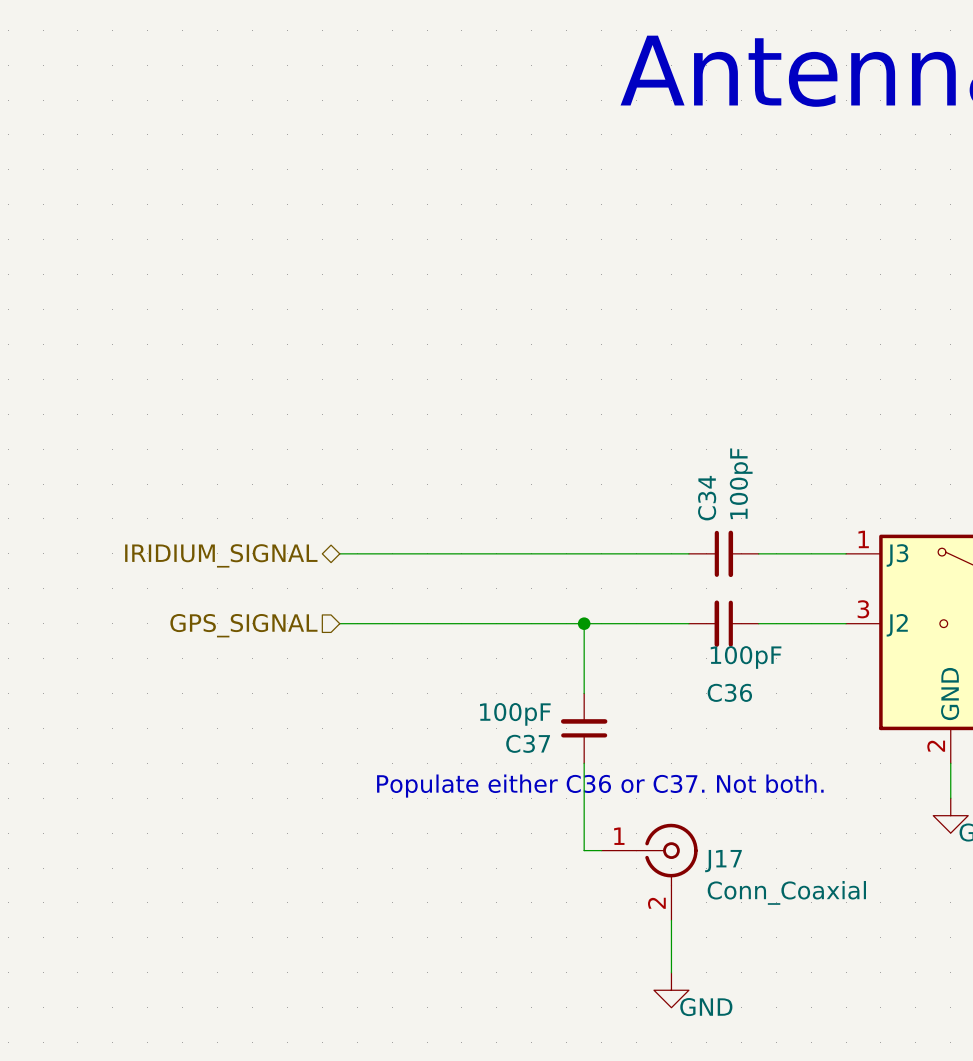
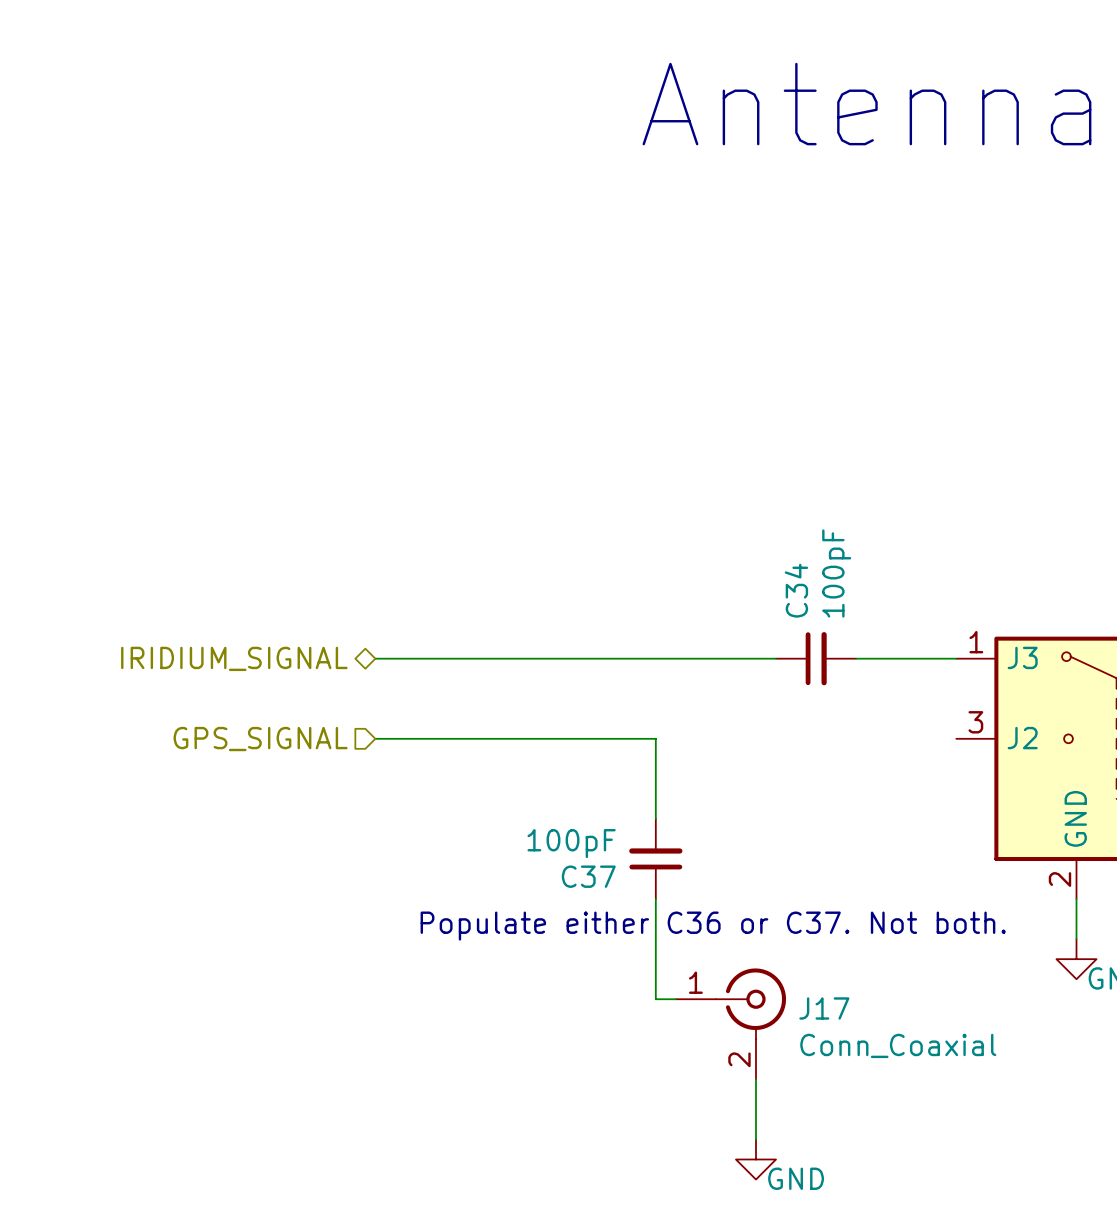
wire: (584, 623) (688, 623) -> none
junction: (584, 623) -> none
C36: 100pF (723, 623) -> none
wire: (758, 623) (846, 623) -> none

